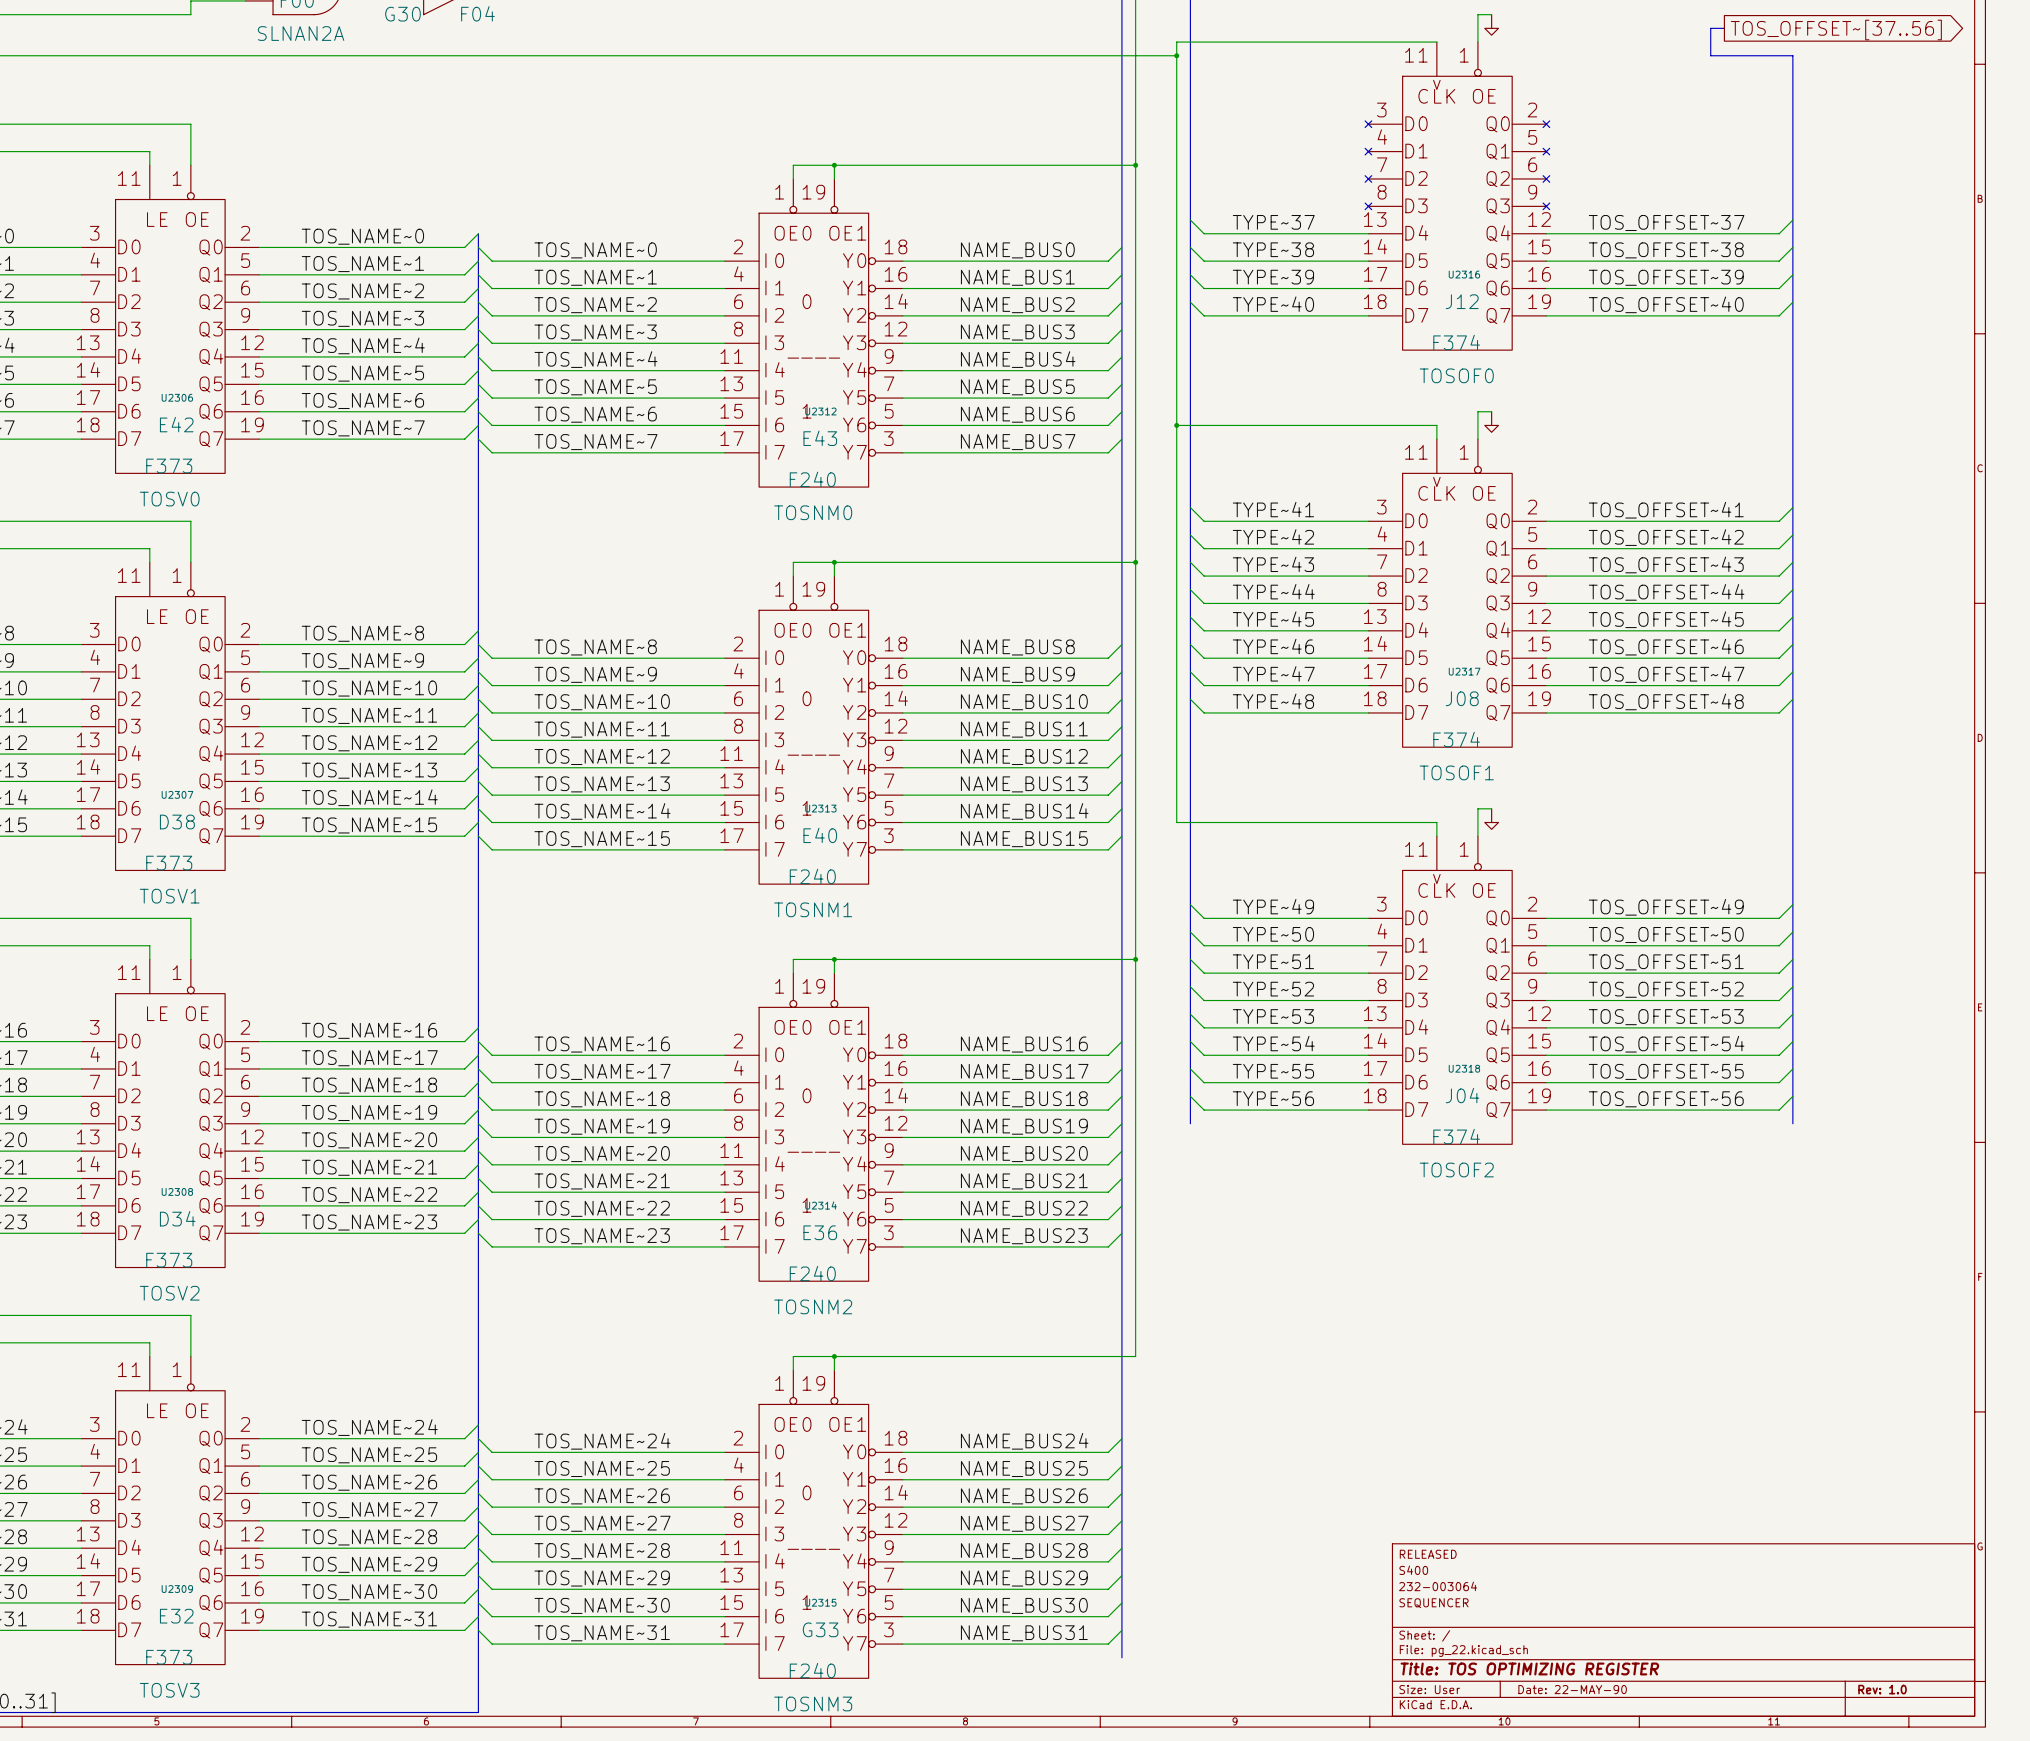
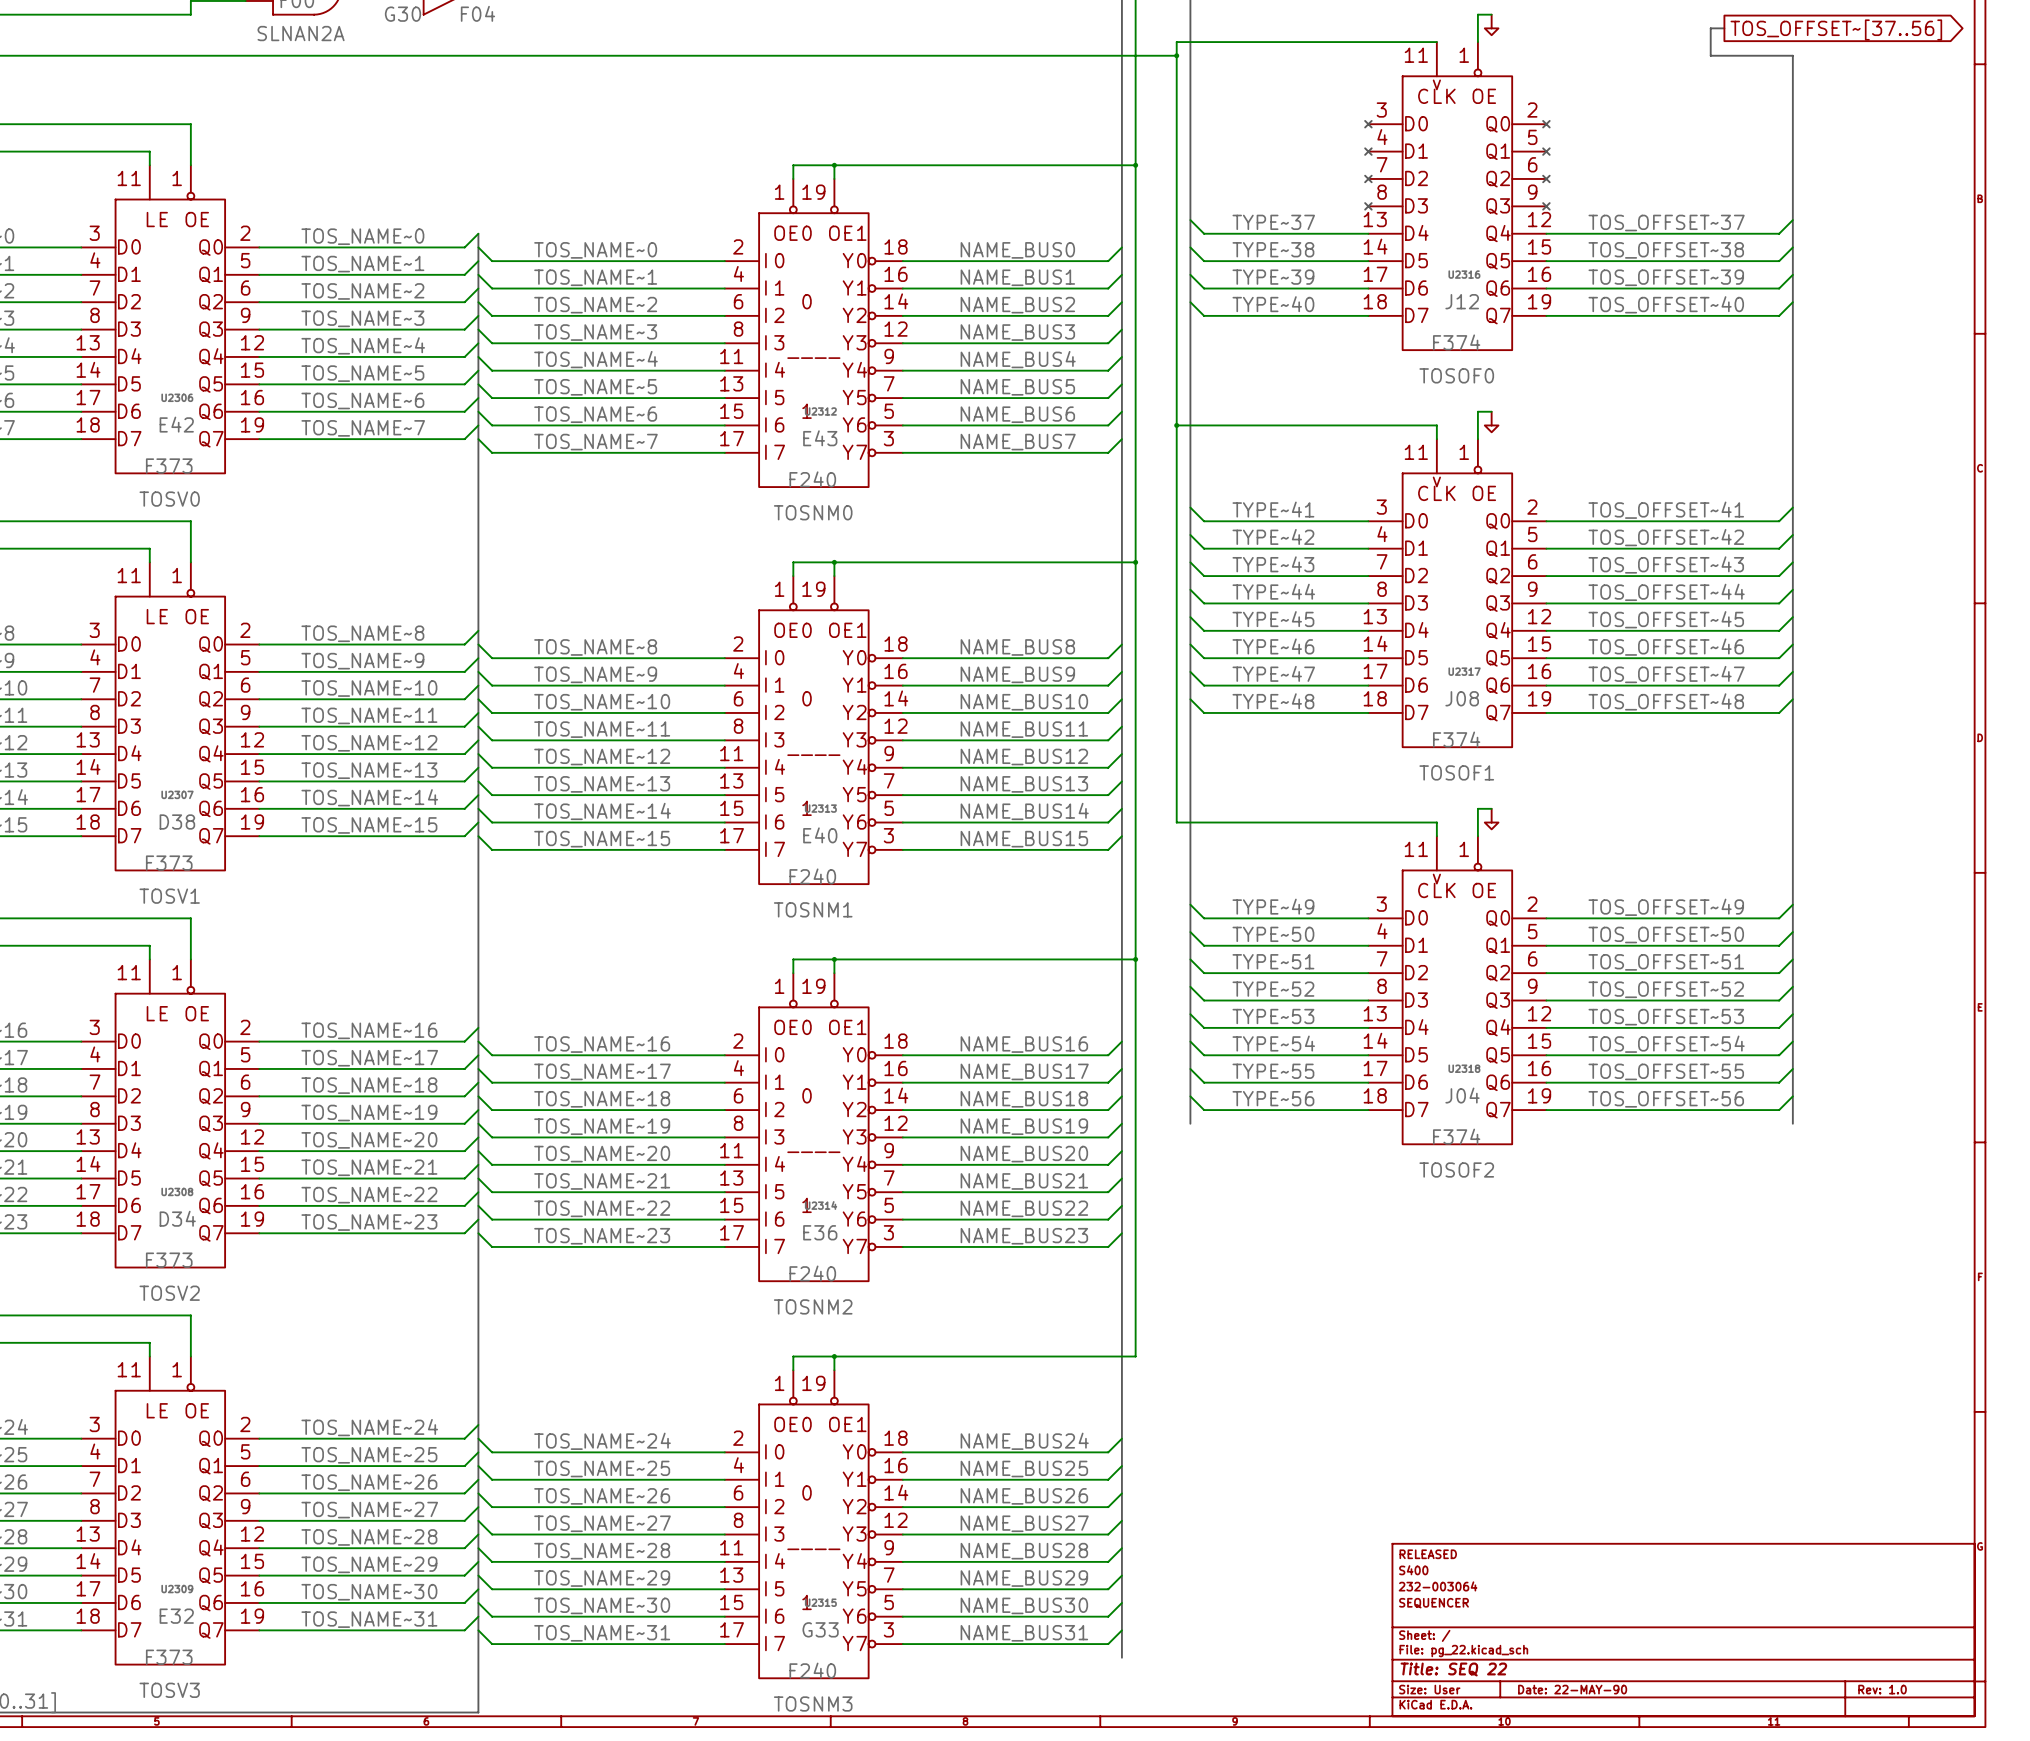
title block: Title: TOS OPTIMIZING REGISTER (1529, 1668) -> Title: SEQ 22 (1453, 1669)

